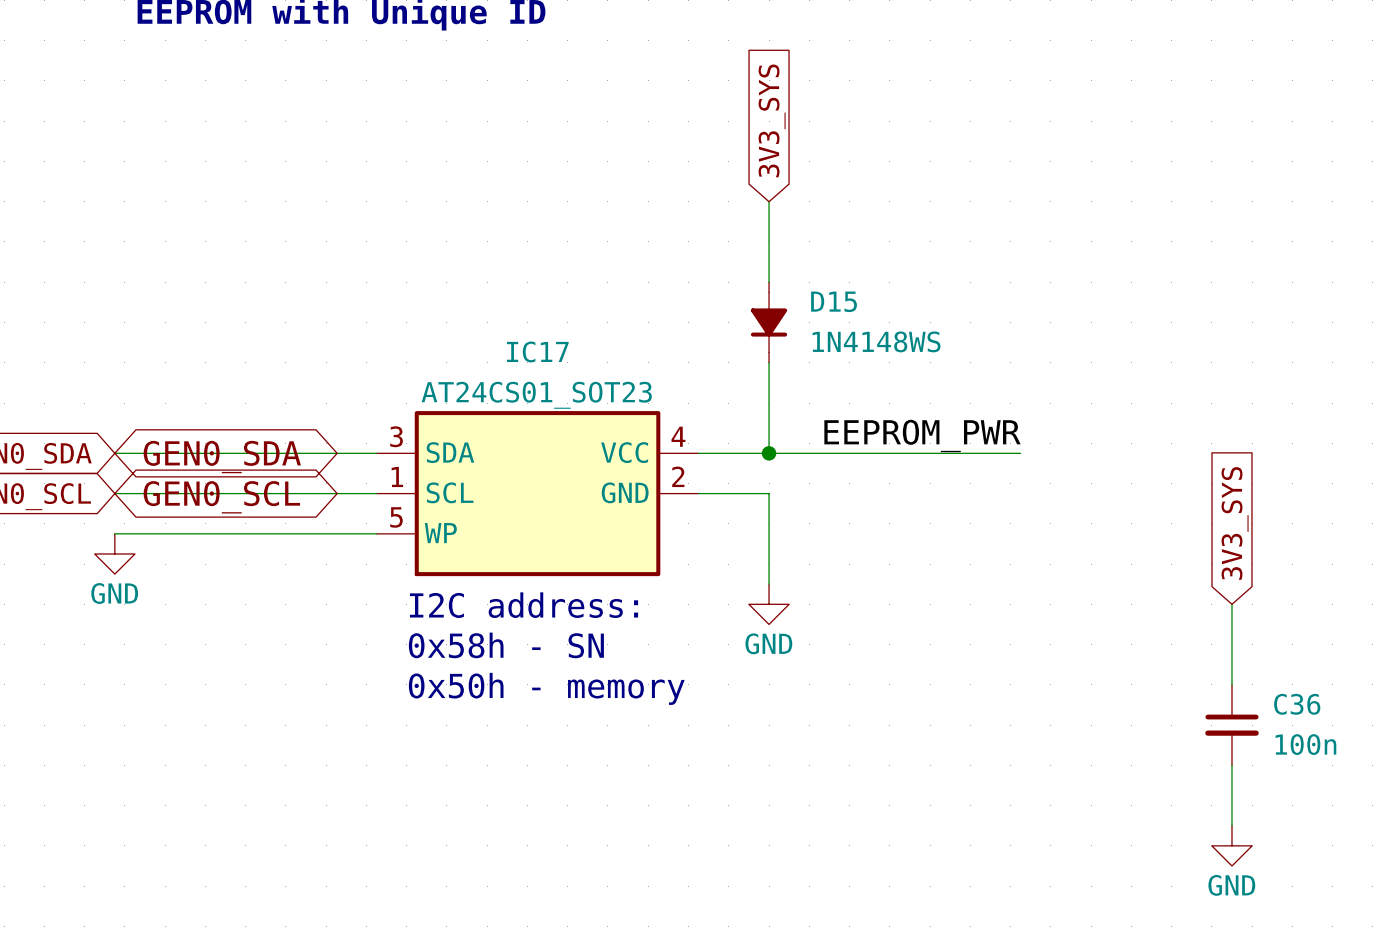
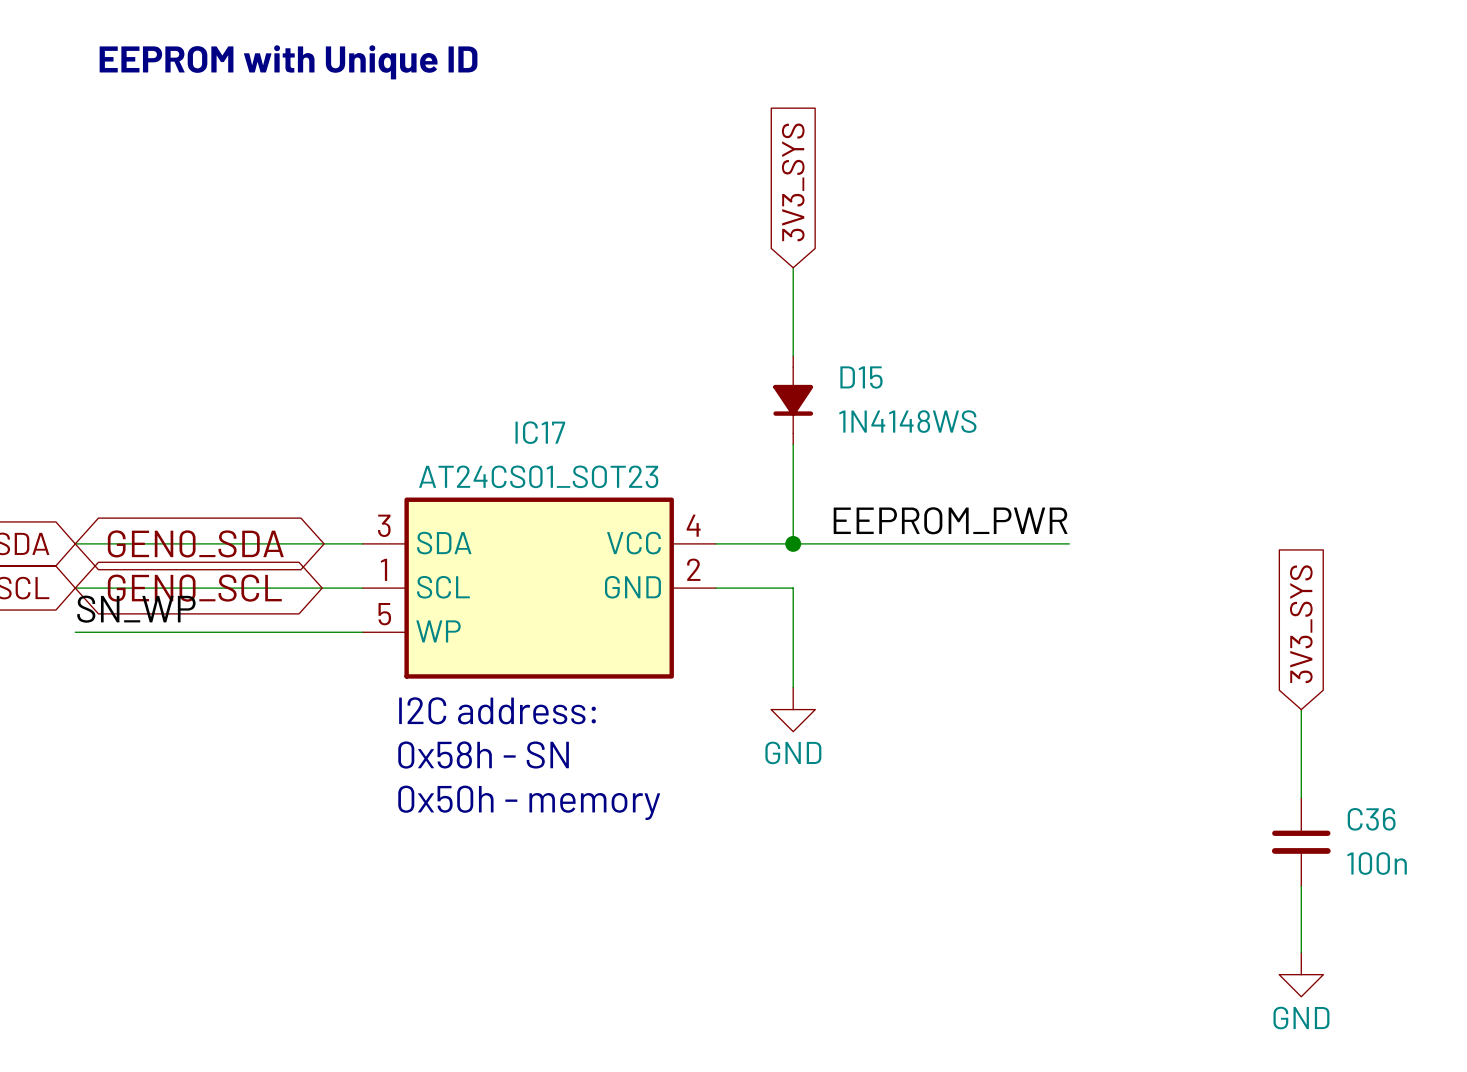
label: none -> SN_WP (136, 609)
power symbol: GND (114, 553) -> none

